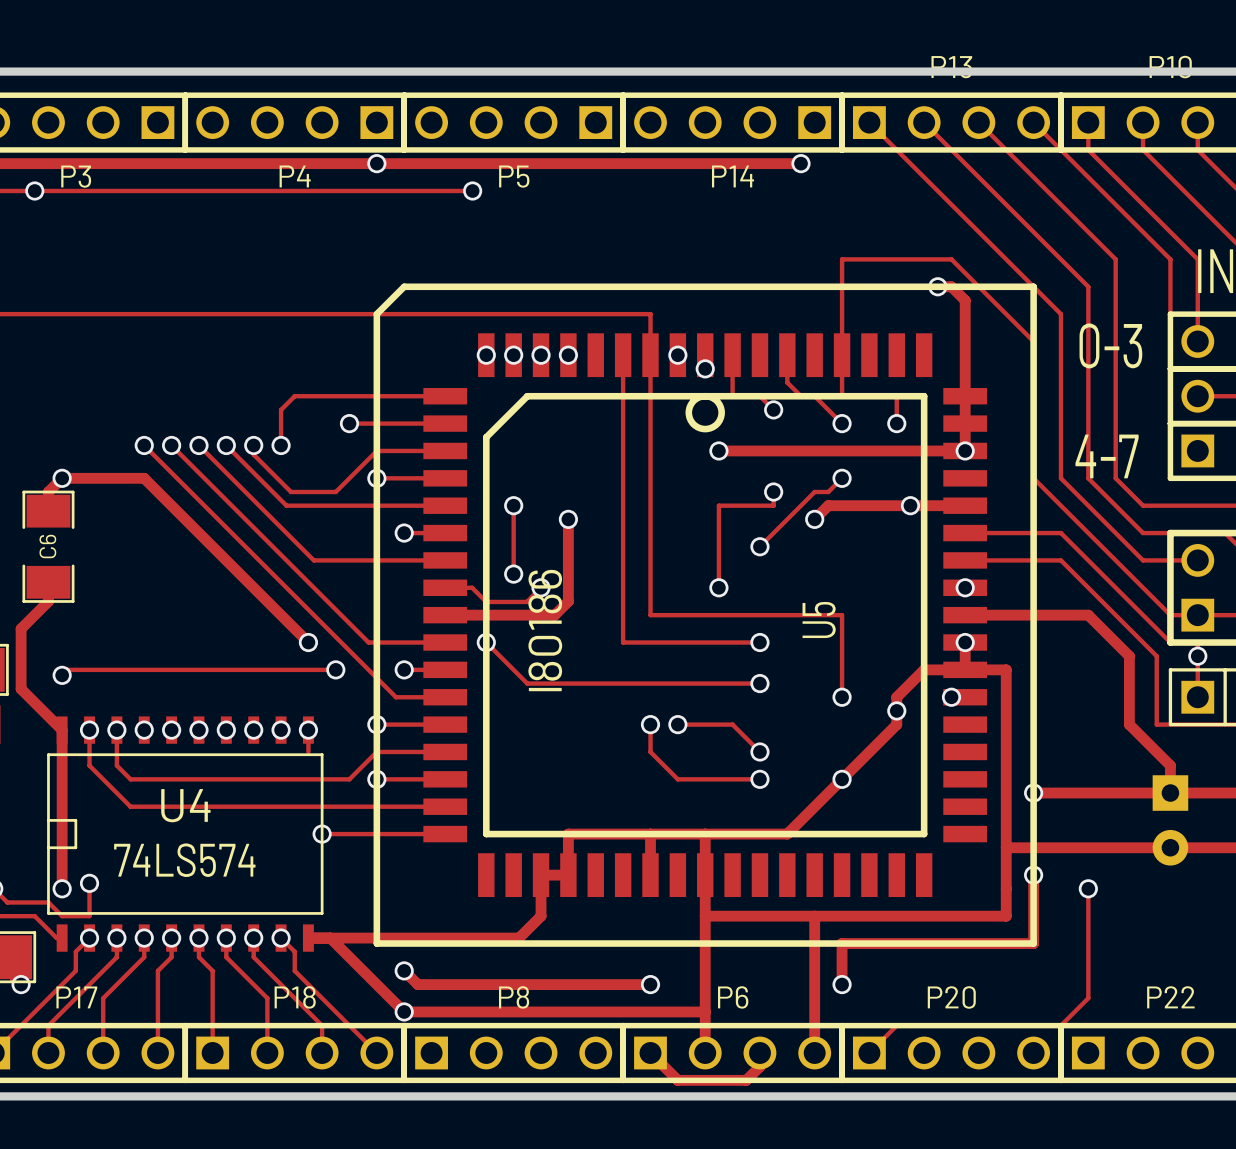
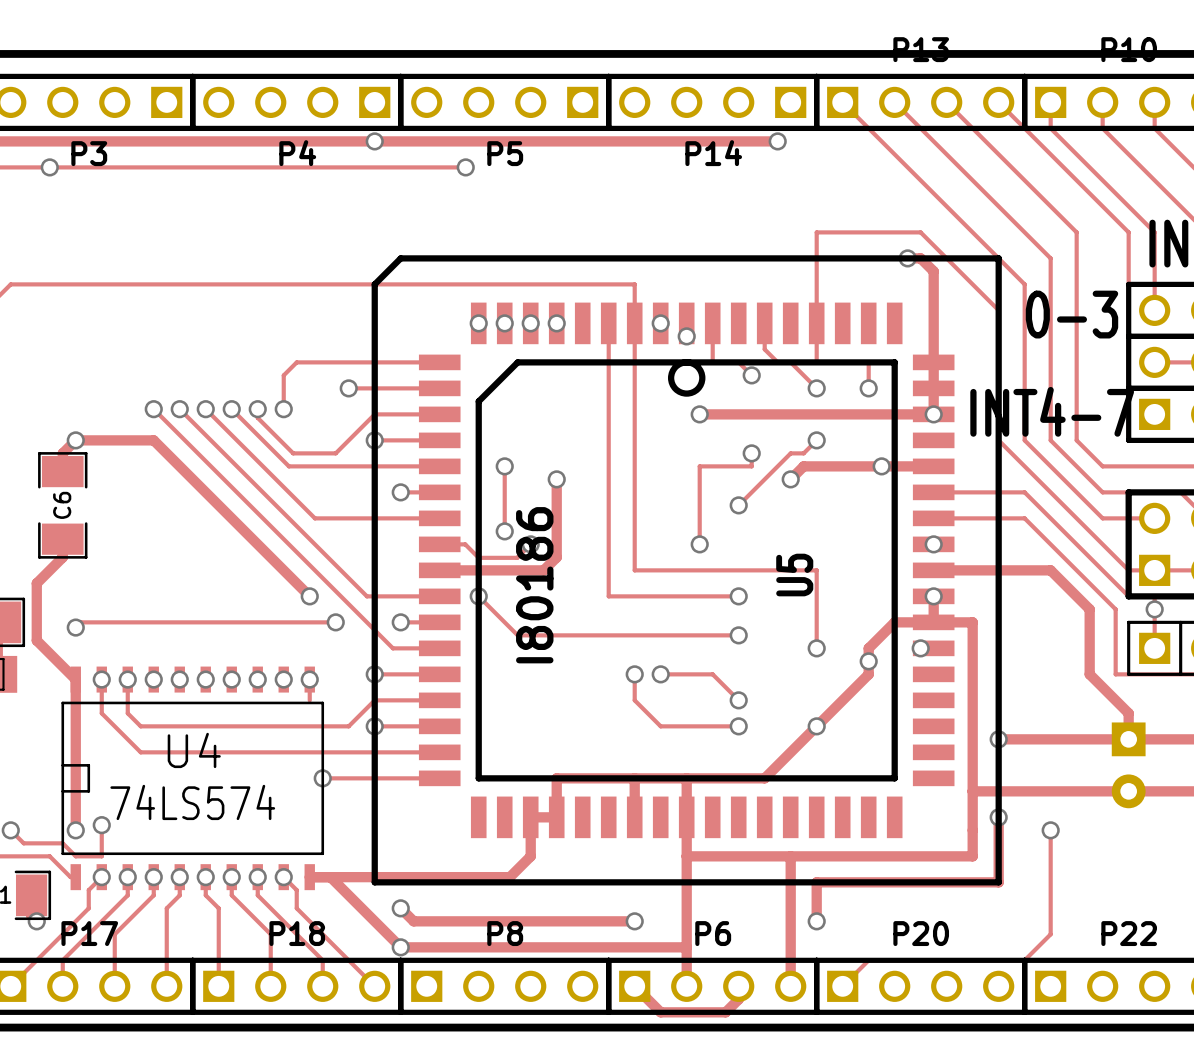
text: 4-7 (1107, 456) -> INT4-7 (1052, 411)

